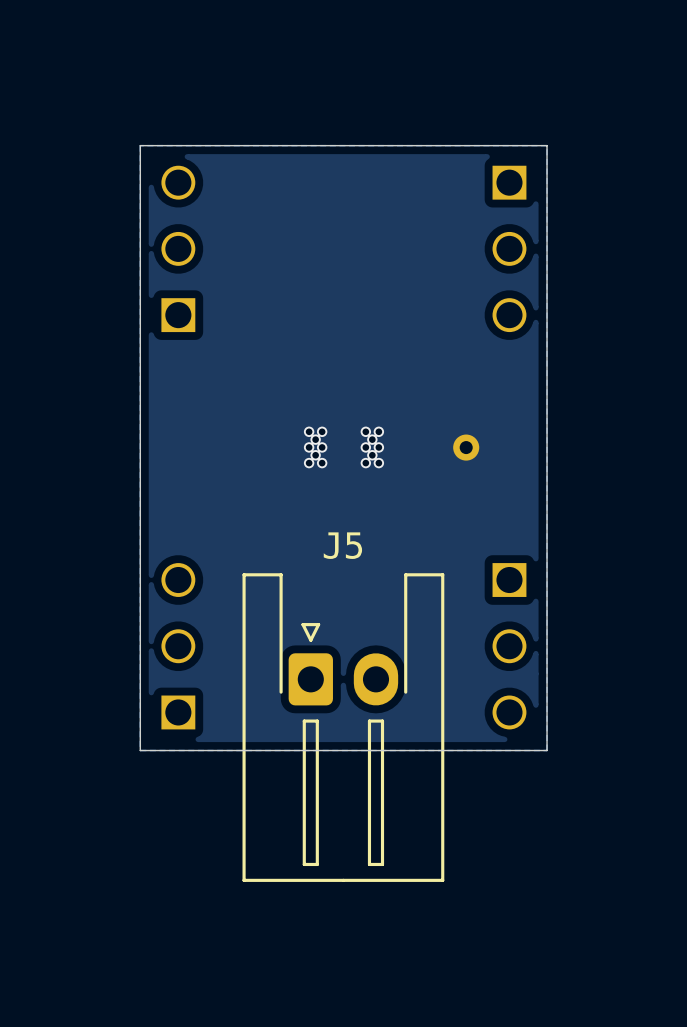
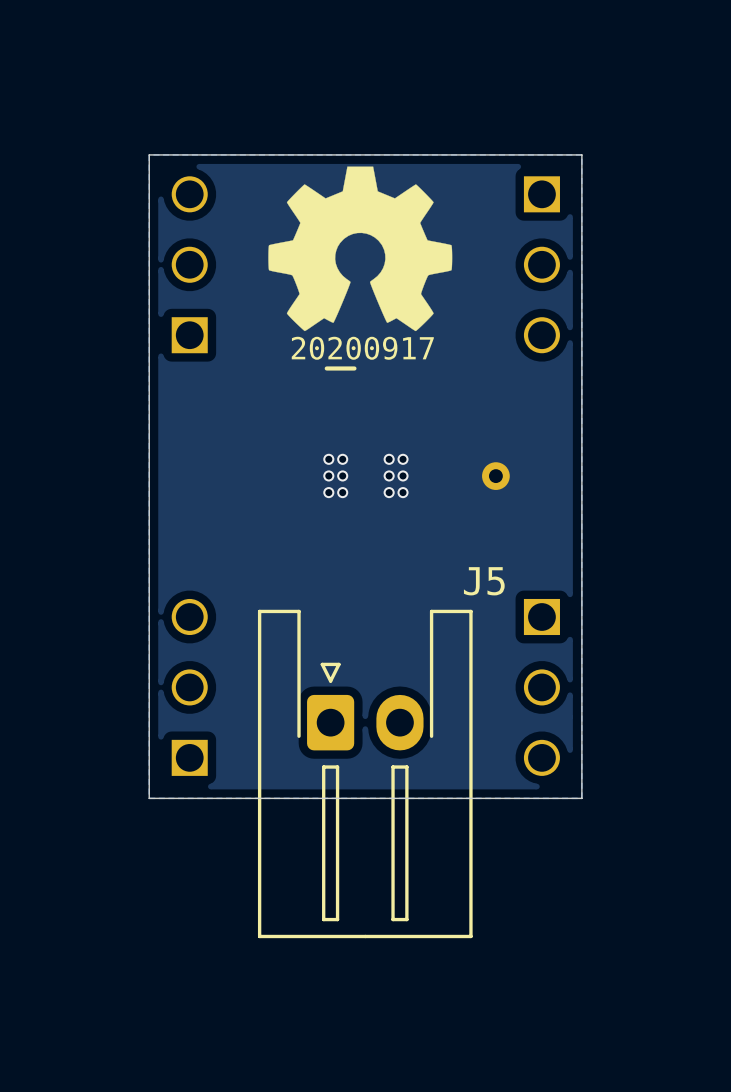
drawing: none -> [268, 166, 453, 371]
via: (315, 439) -> none
via: (372, 439) -> none
via: (315, 455) -> none
via: (372, 455) -> none
J5 name position: J5 (342, 545) -> J5 (484, 581)

